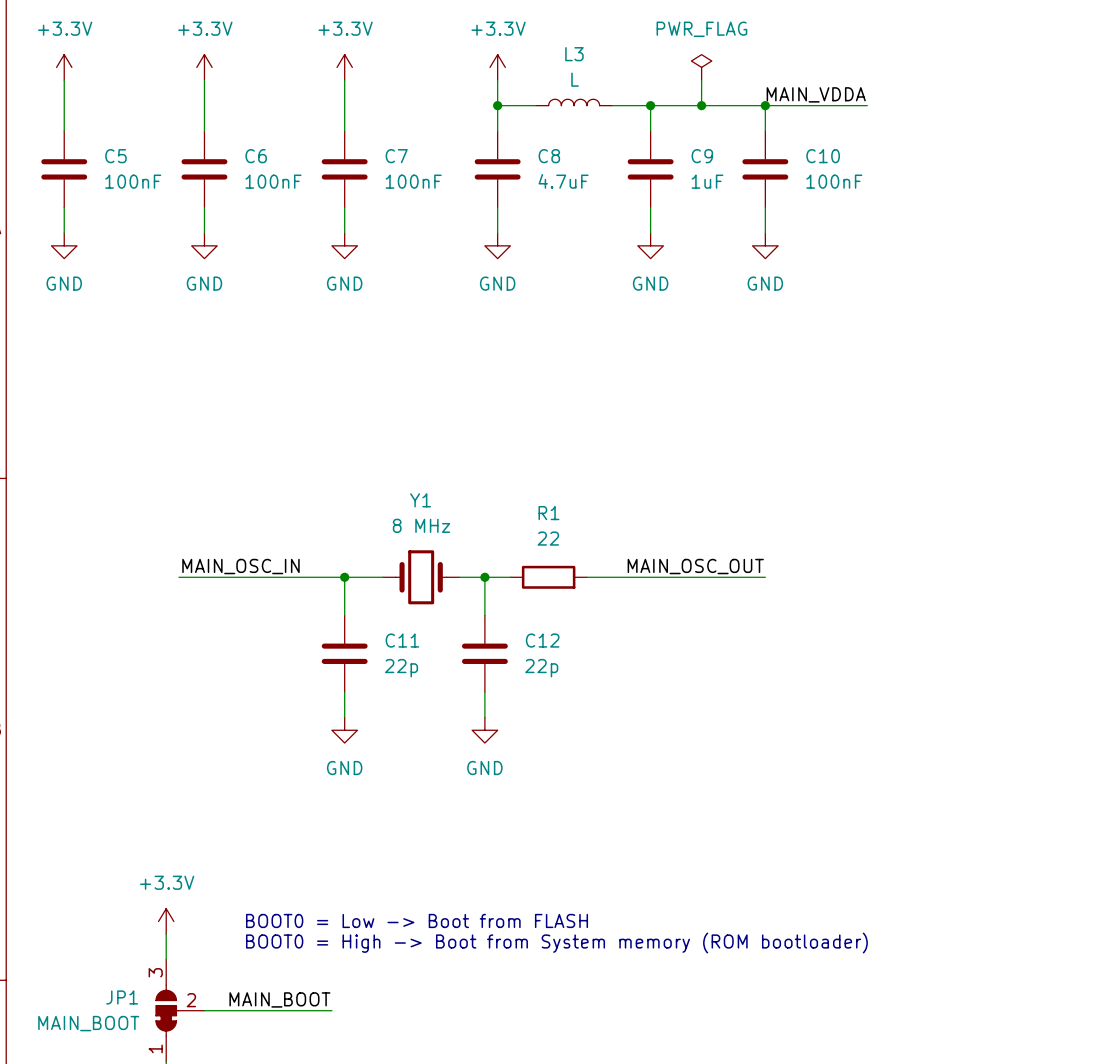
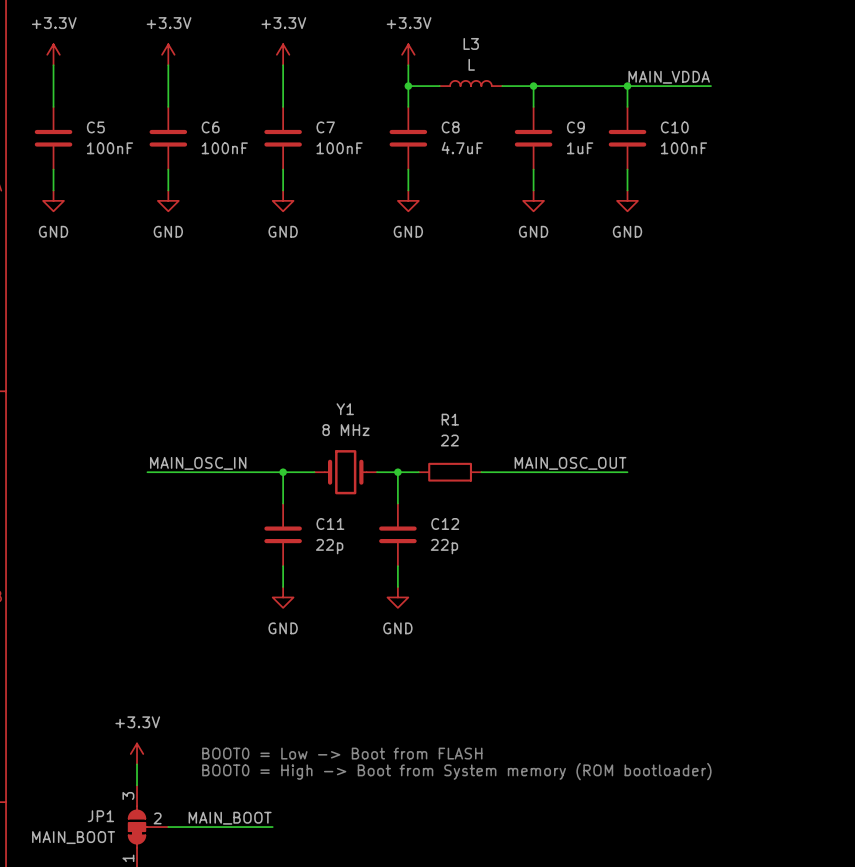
power symbol: PWR_FLAG (701, 67) -> none
wire: (701, 80) (701, 105) -> none
junction: (701, 105) -> none

